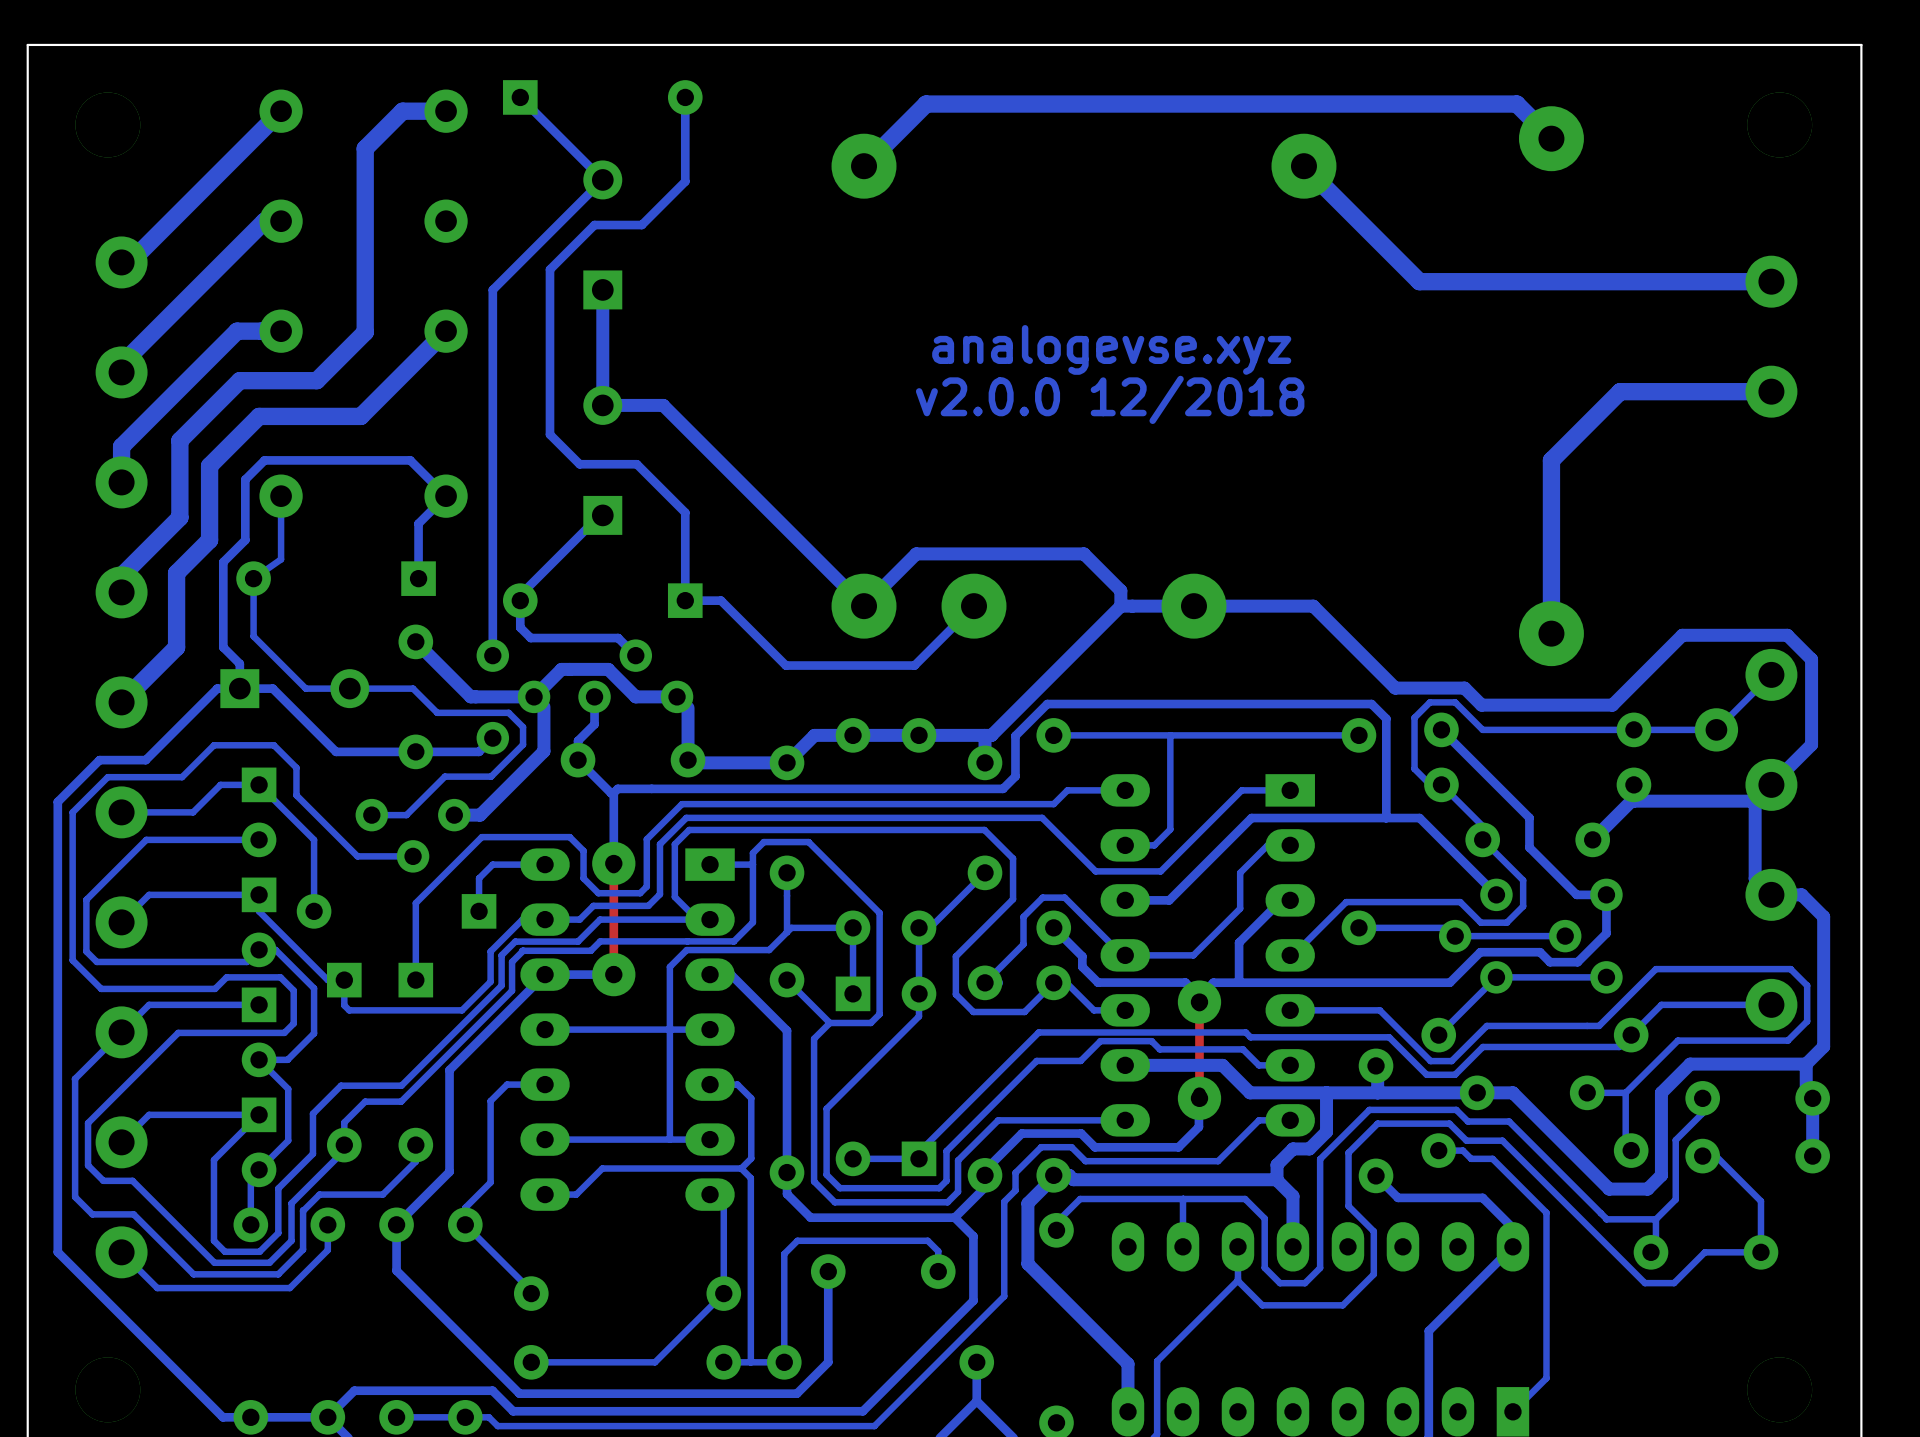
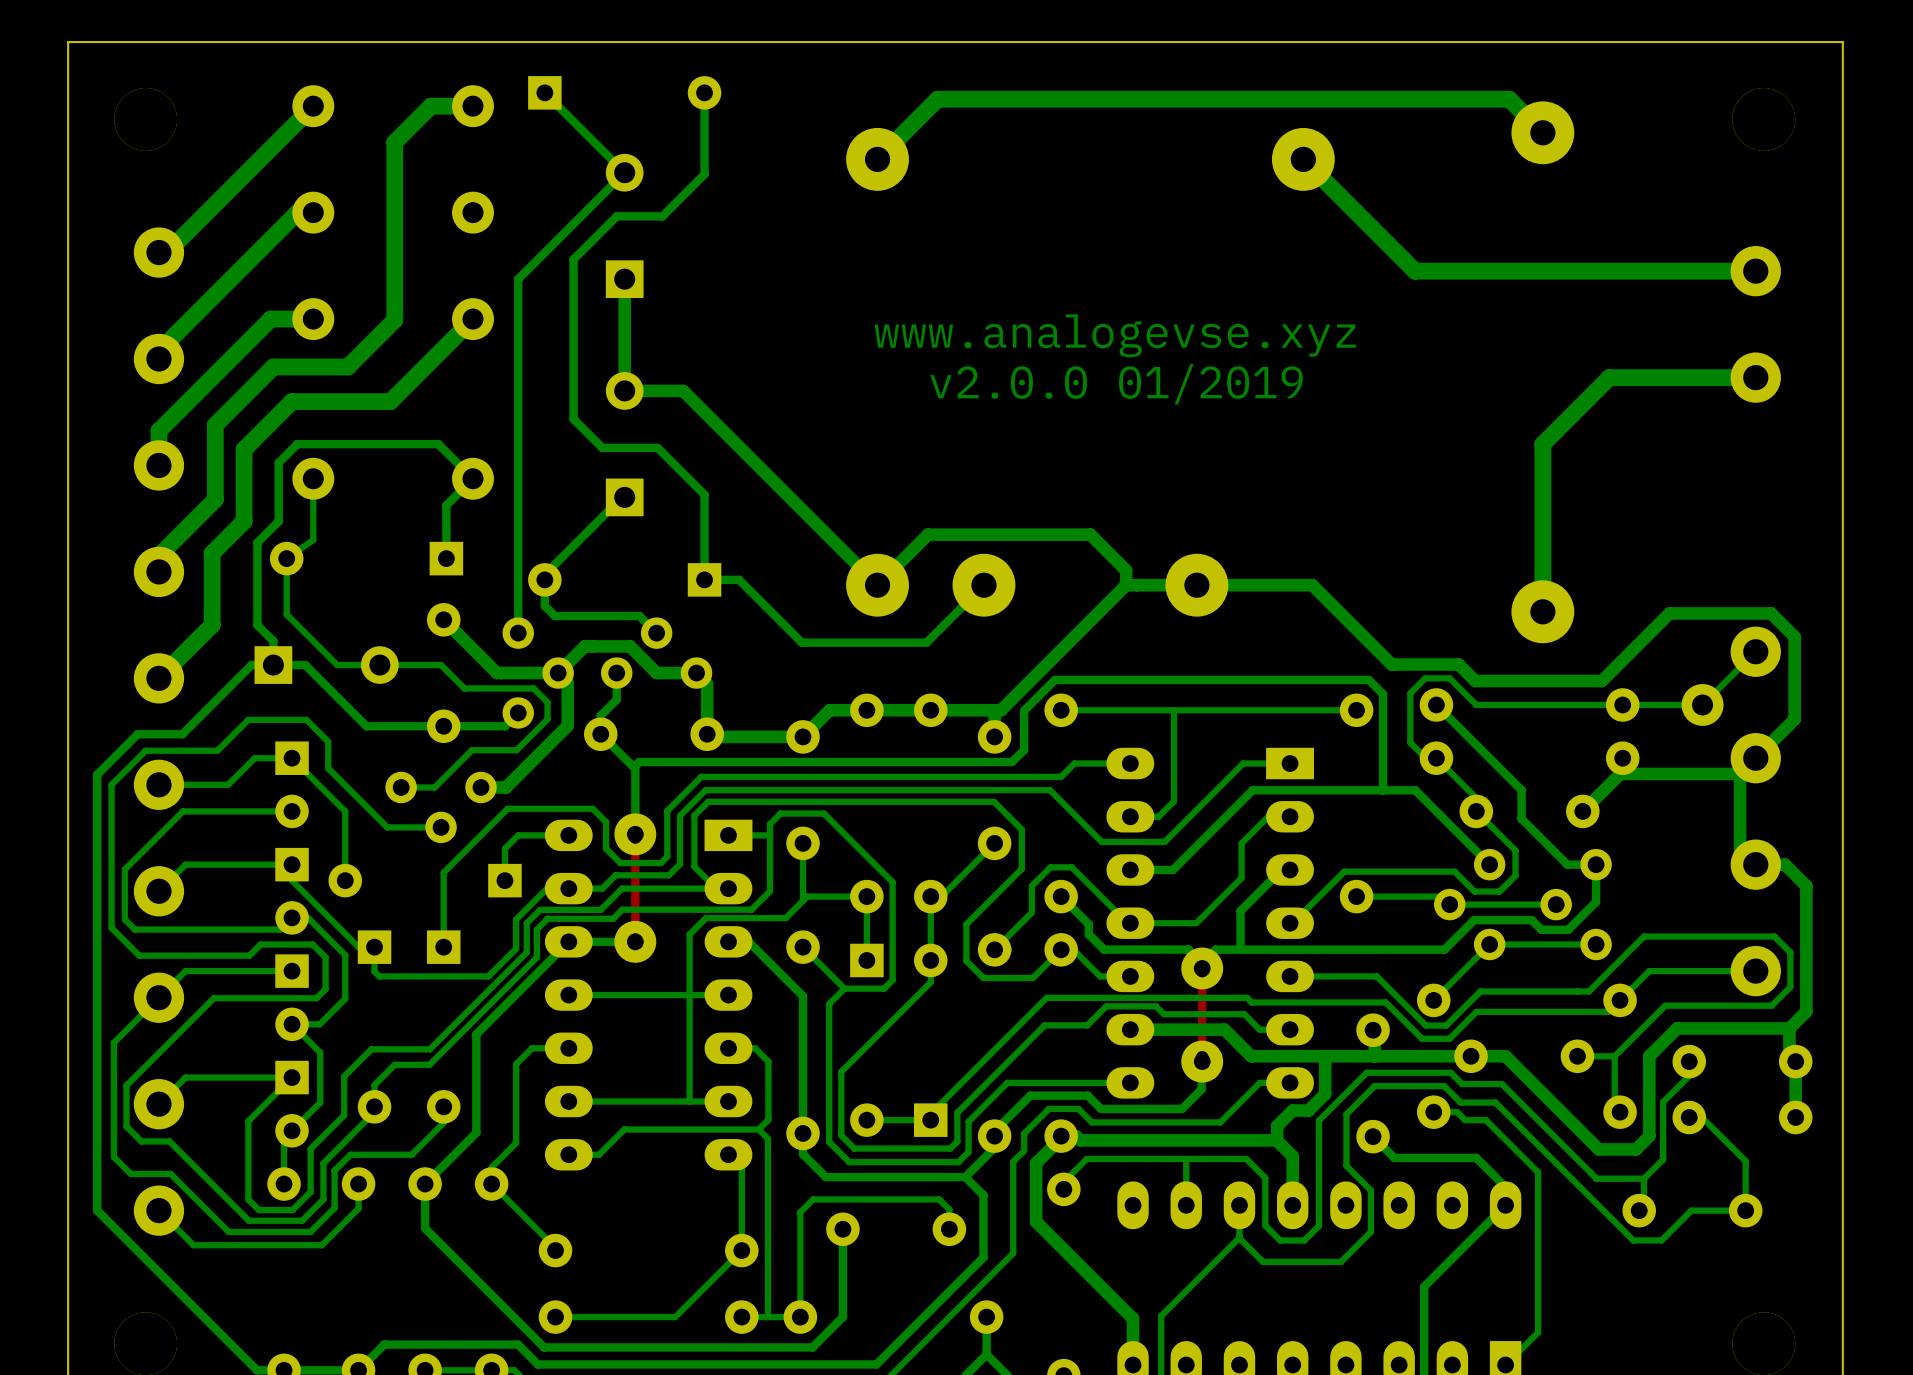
text: analogevse.xyz (1111, 349) -> www.analogevse.xyz (1115, 335)
text: v2.0.0 12/2018 (1110, 399) -> v2.0.0 01/2019 (1116, 384)

